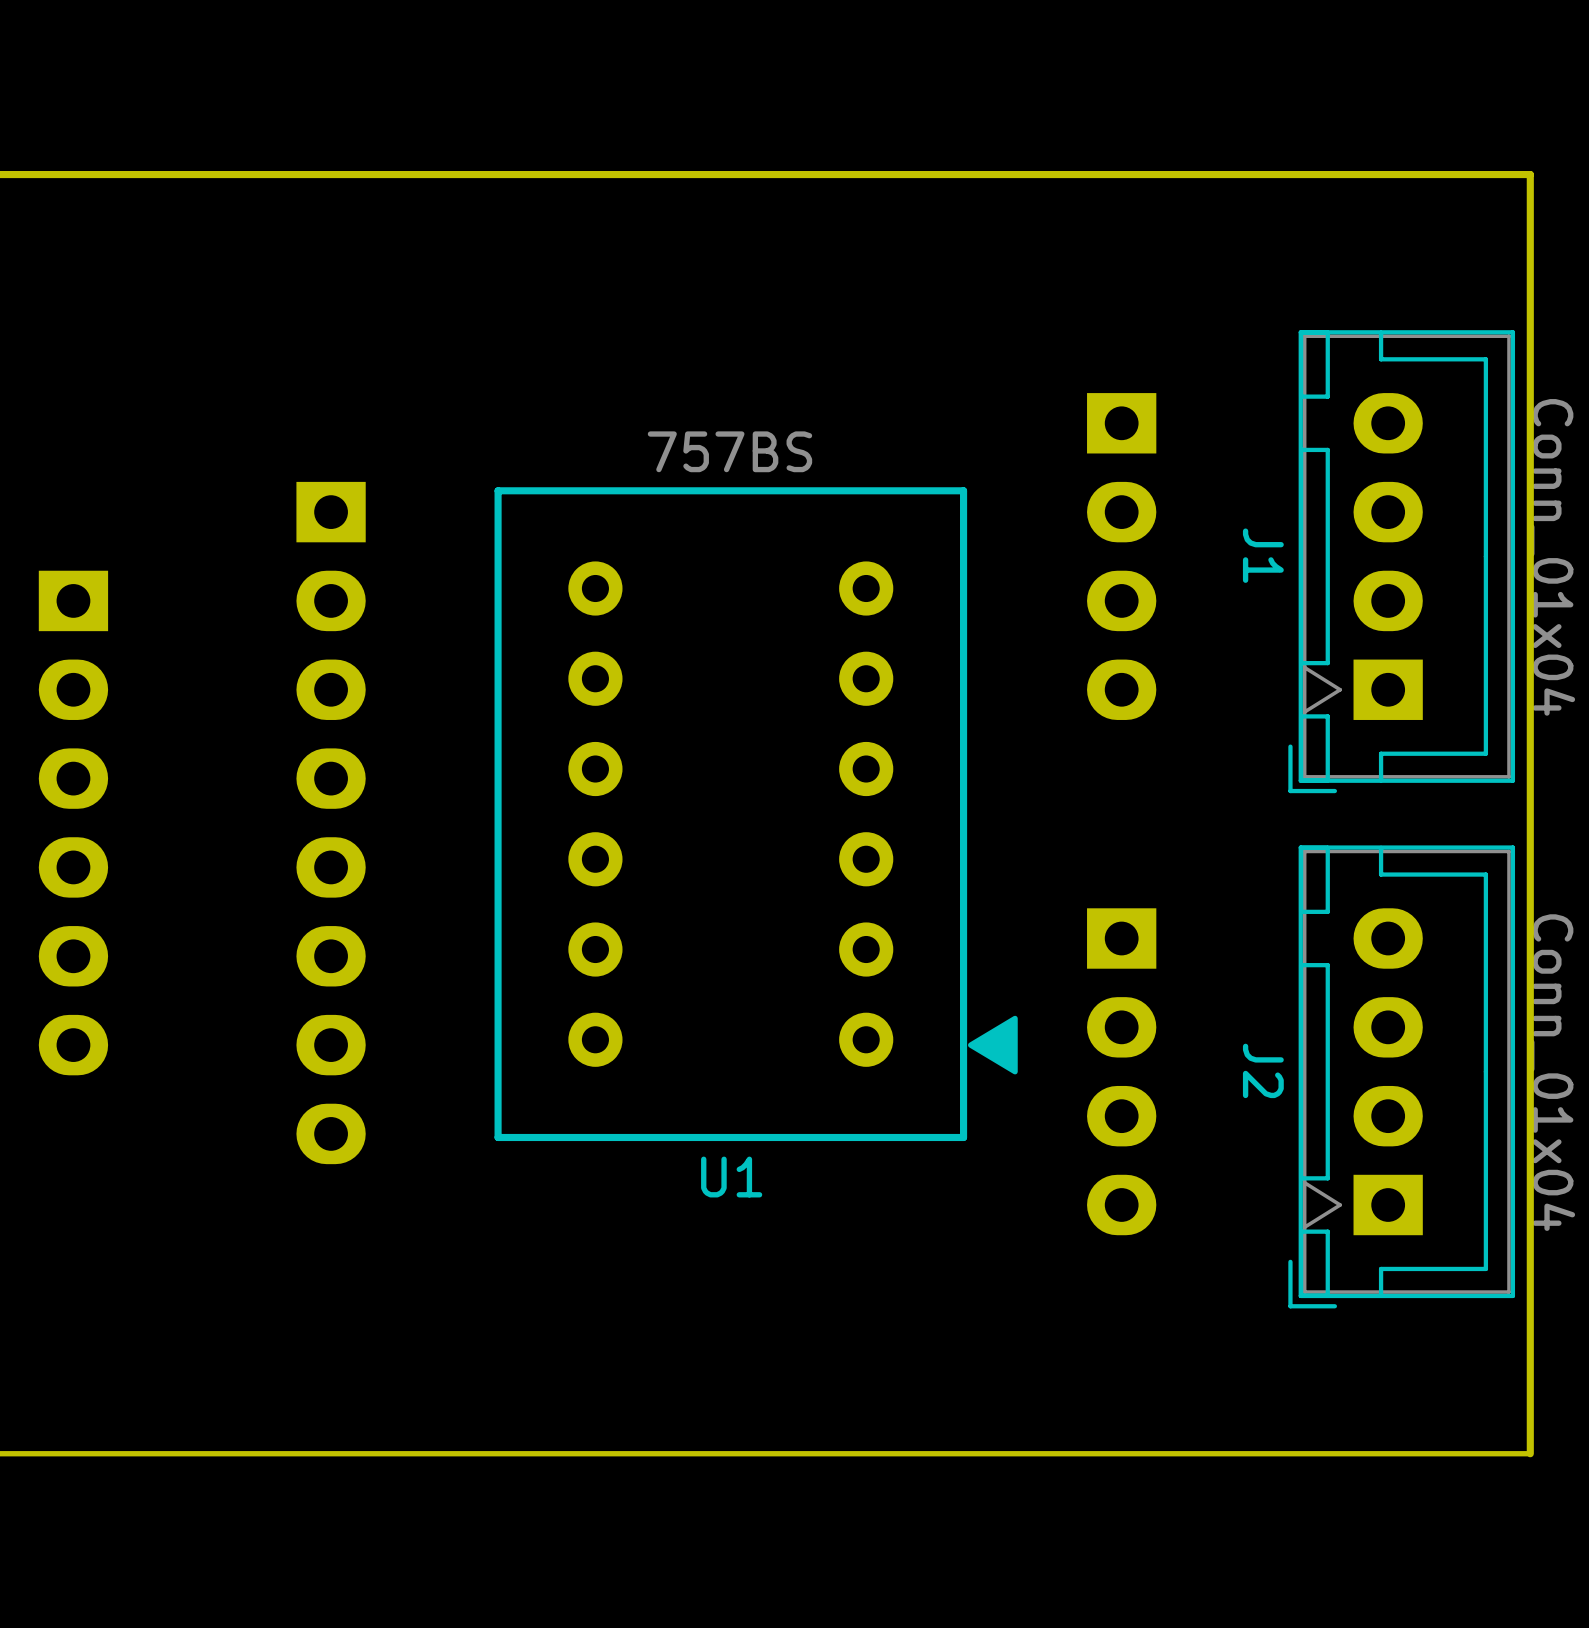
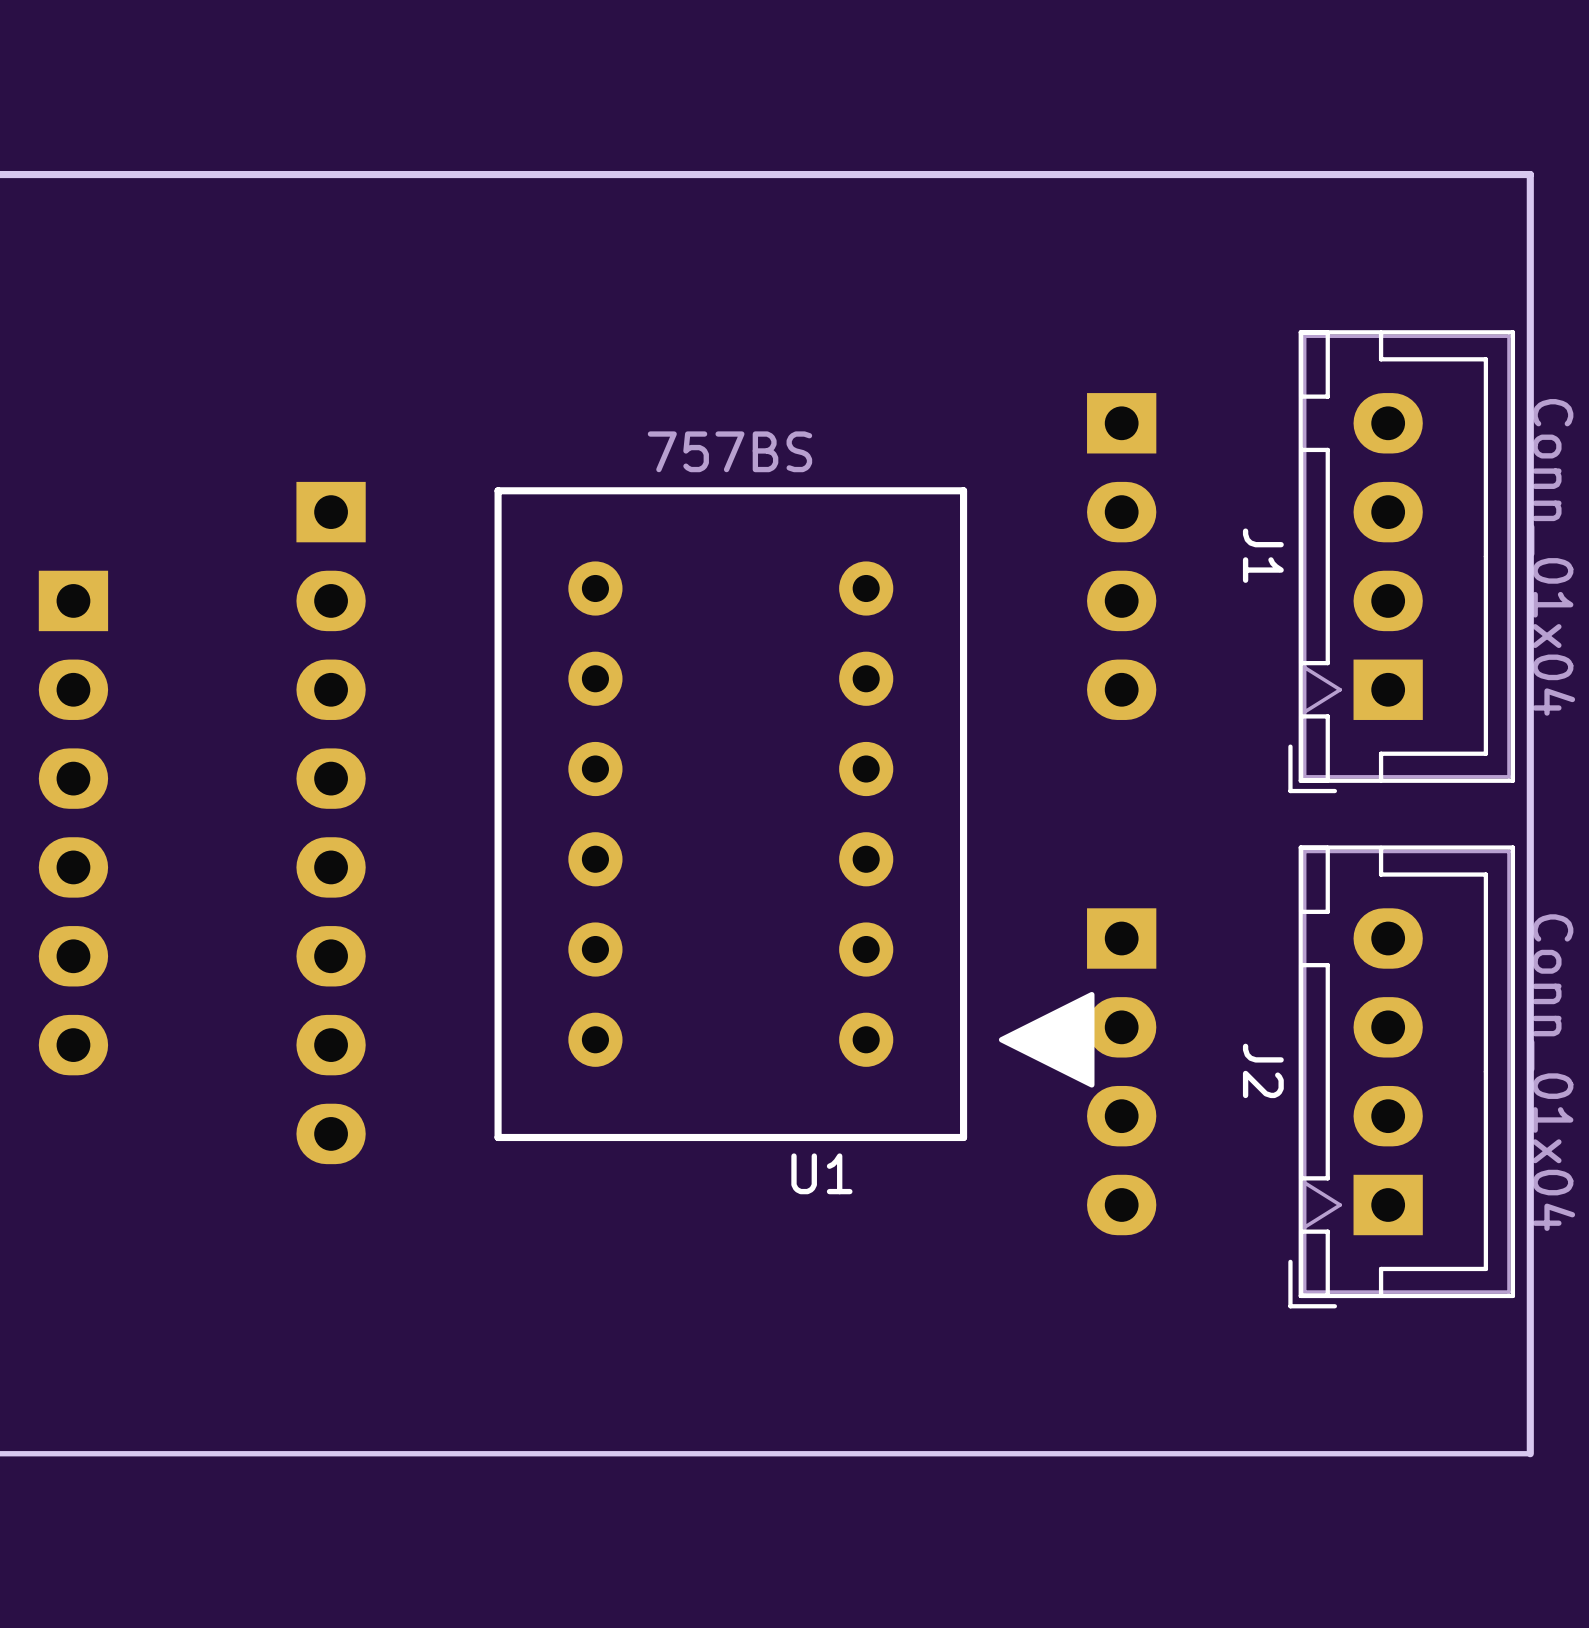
U1 footprint: [494, 487, 1018, 1142] -> [494, 487, 1095, 1142]

